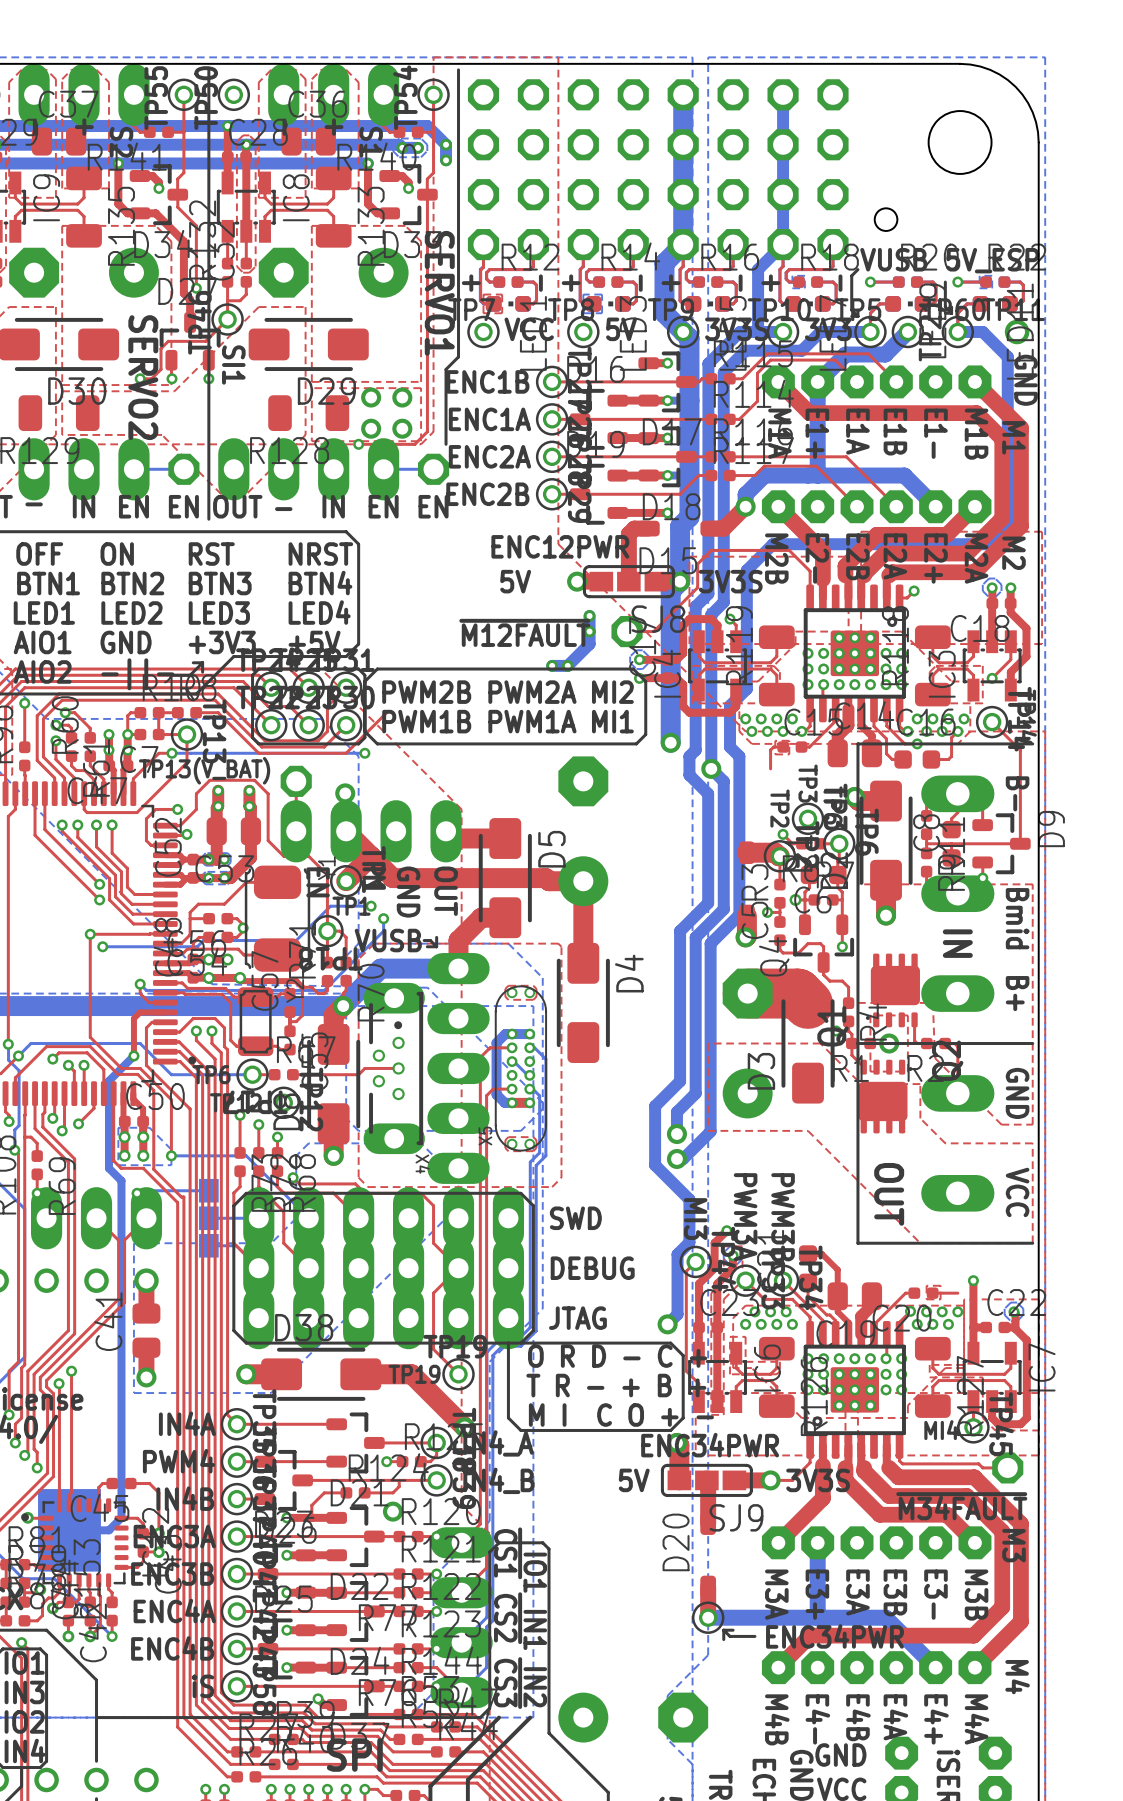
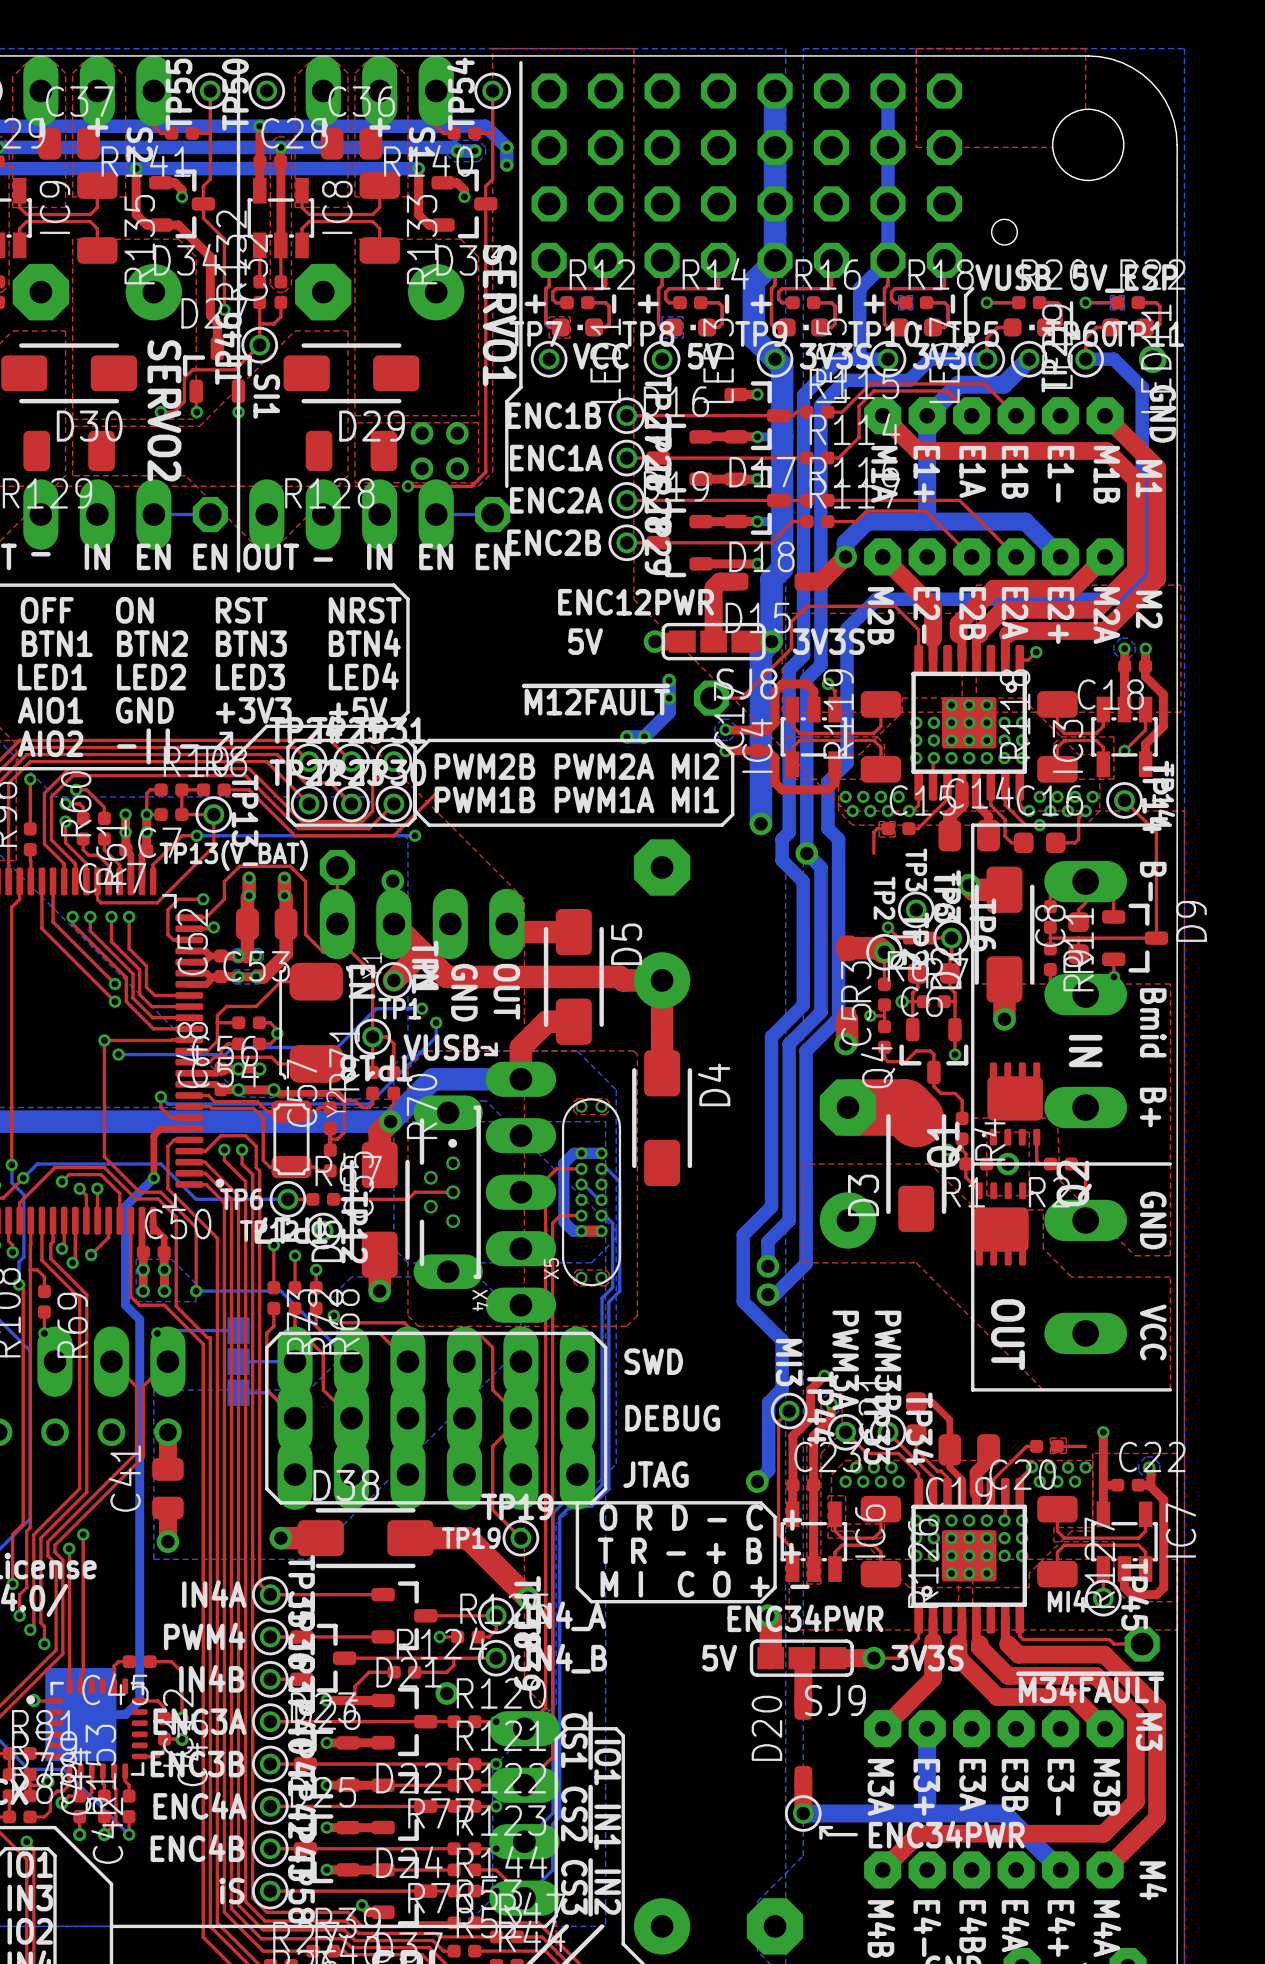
top zone outline: none -> (916, 48) (916, 147) (1085, 147) (1085, 48) (916, 48)

